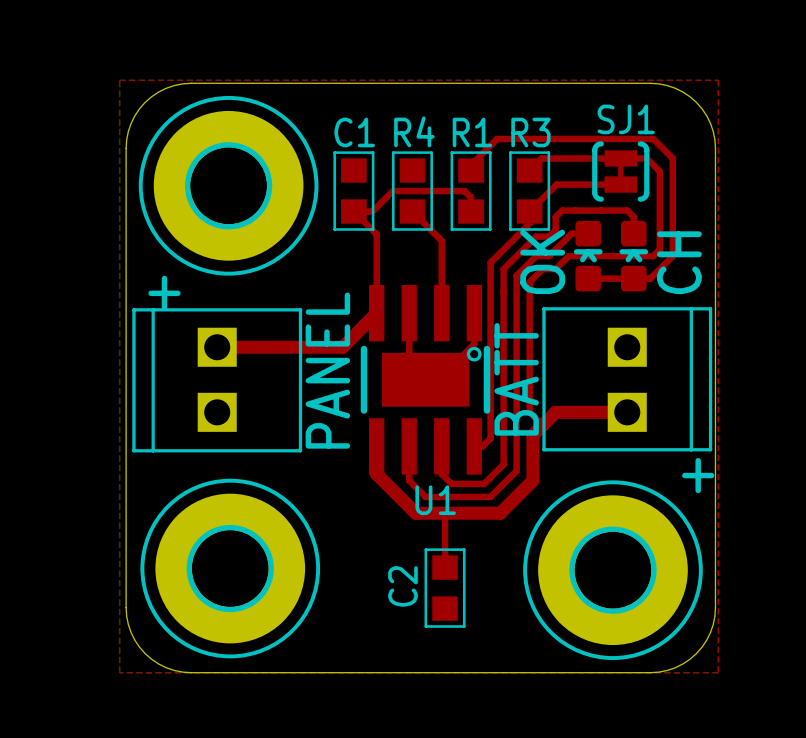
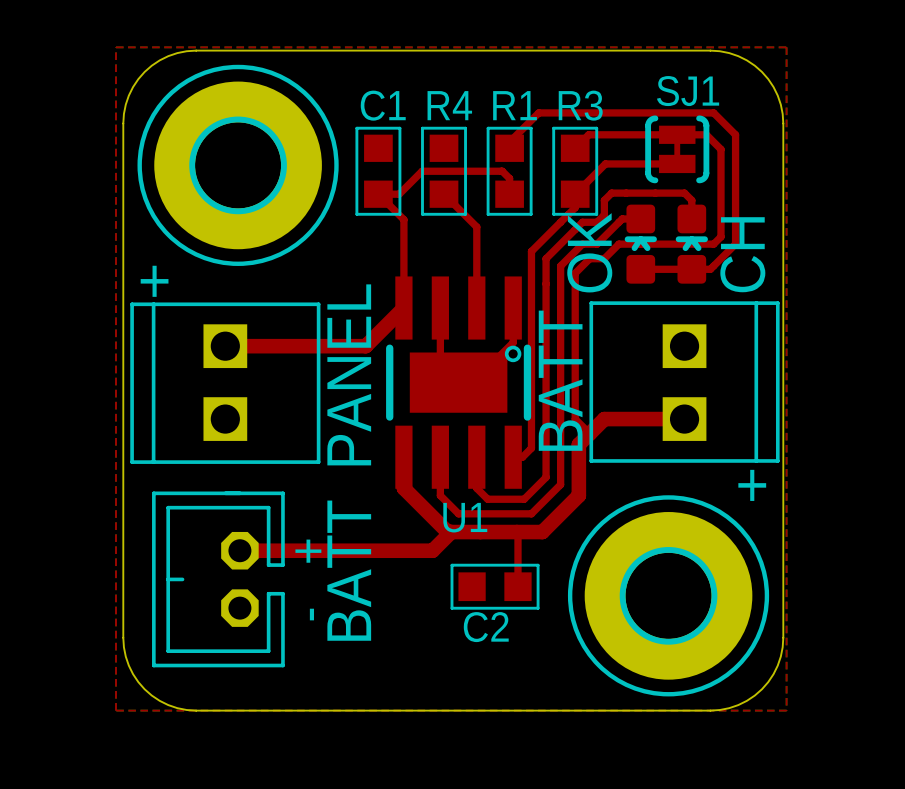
part footprint: [140, 478, 321, 659] -> [152, 491, 285, 668]
top track: none -> (451, 532) (432, 550) (239, 550)
top track: (445, 513) (445, 567) -> none
top track: none -> (516, 532) (517, 586)
text: none -> BATT (349, 570)
C2 rotation: 0° (445, 588) -> 90° clockwise (495, 586)

